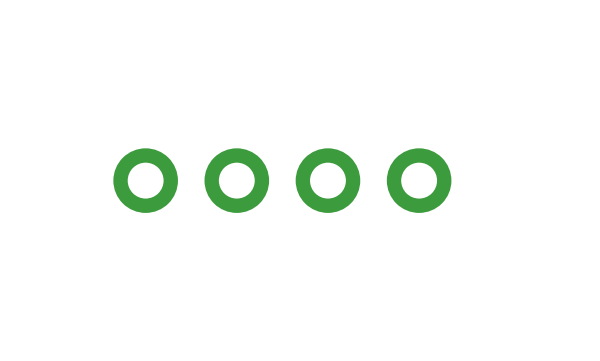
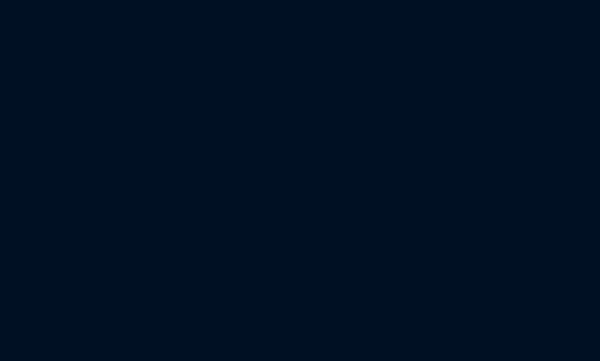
part: (282, 180) -> none

